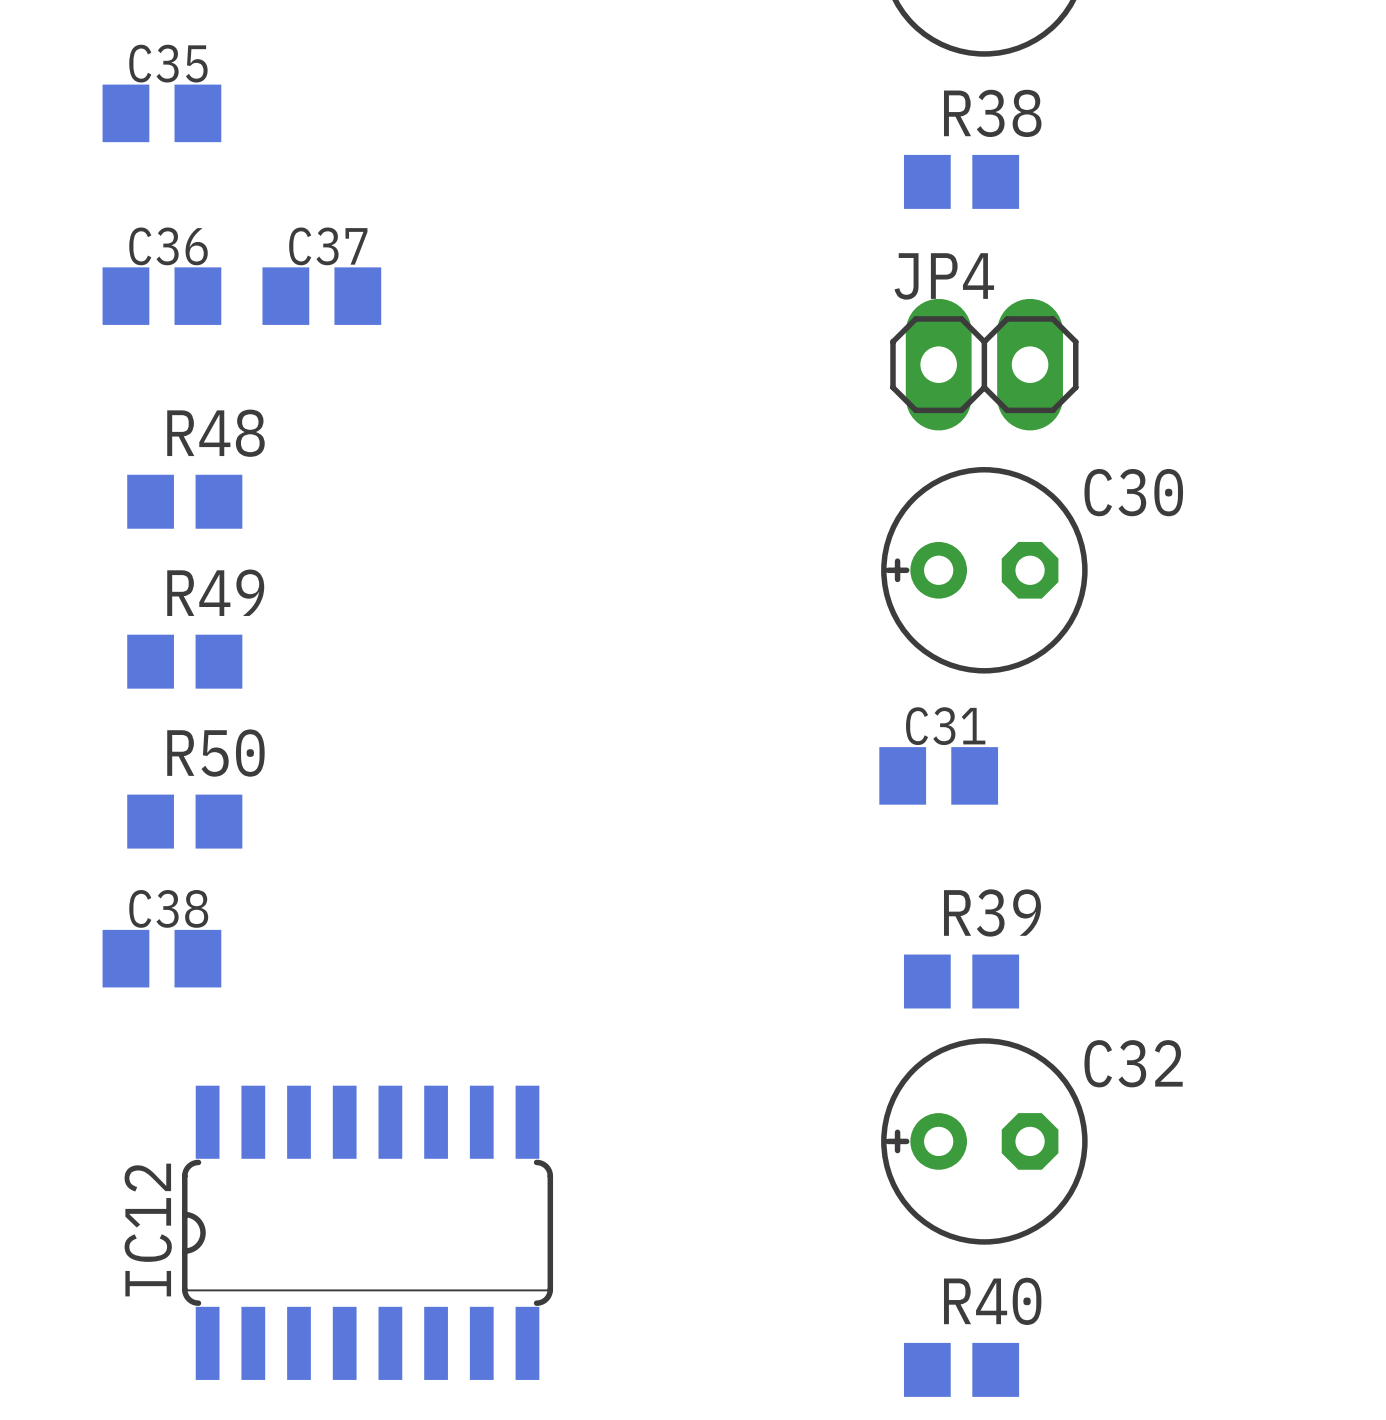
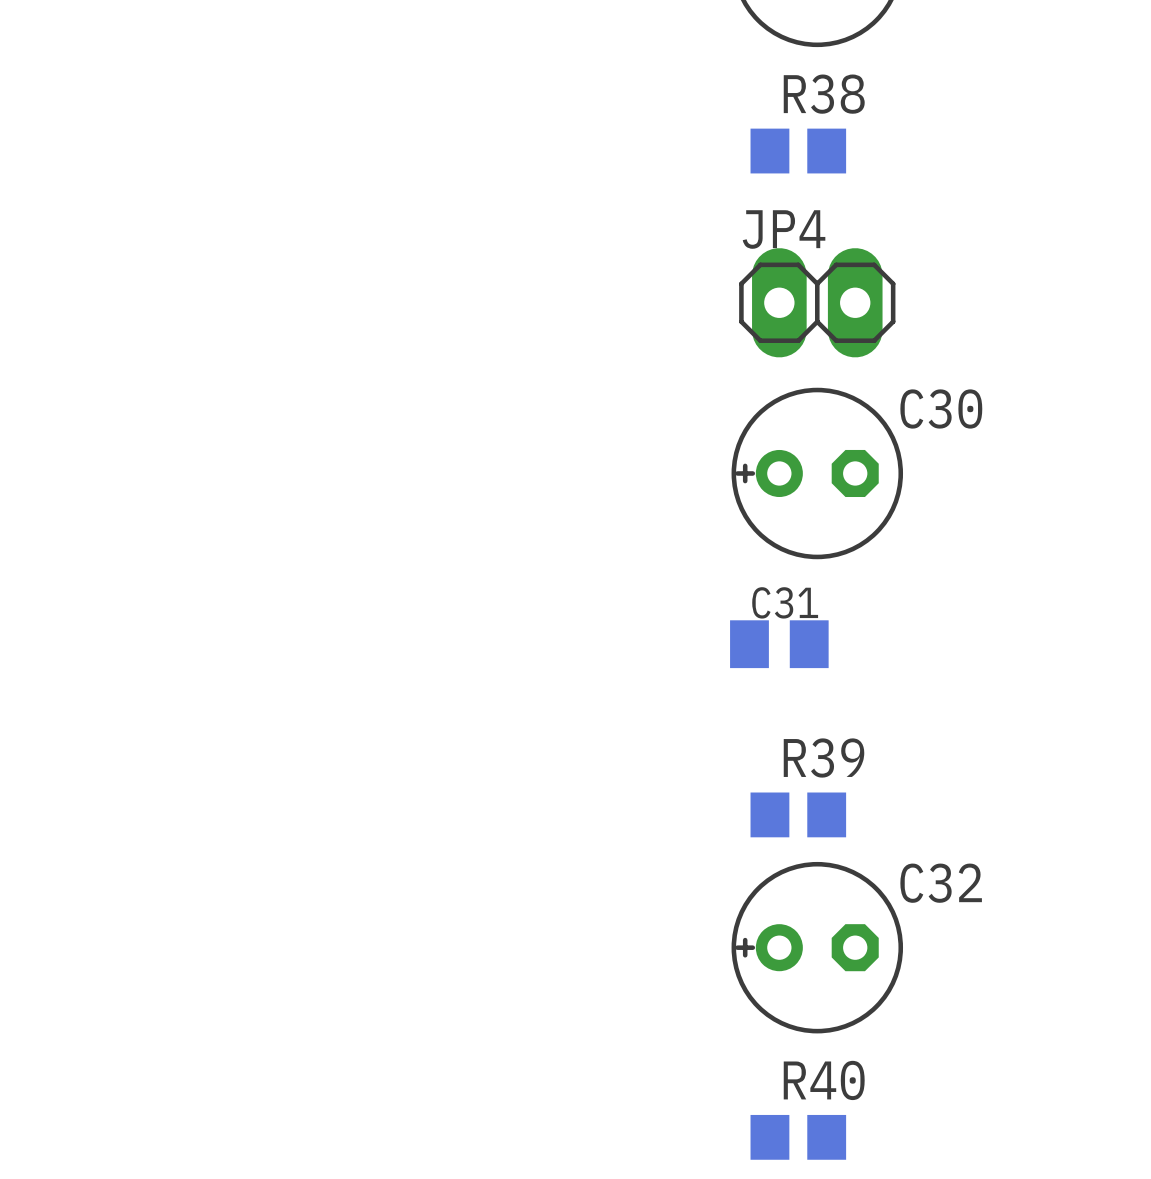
C35: (161, 113) -> none
C36: (161, 296) -> none
C37: (321, 296) -> none
R48: (184, 501) -> none
R49: (184, 661) -> none
R50: (184, 821) -> none
C38: (161, 958) -> none
IC12: (367, 1232) -> none

